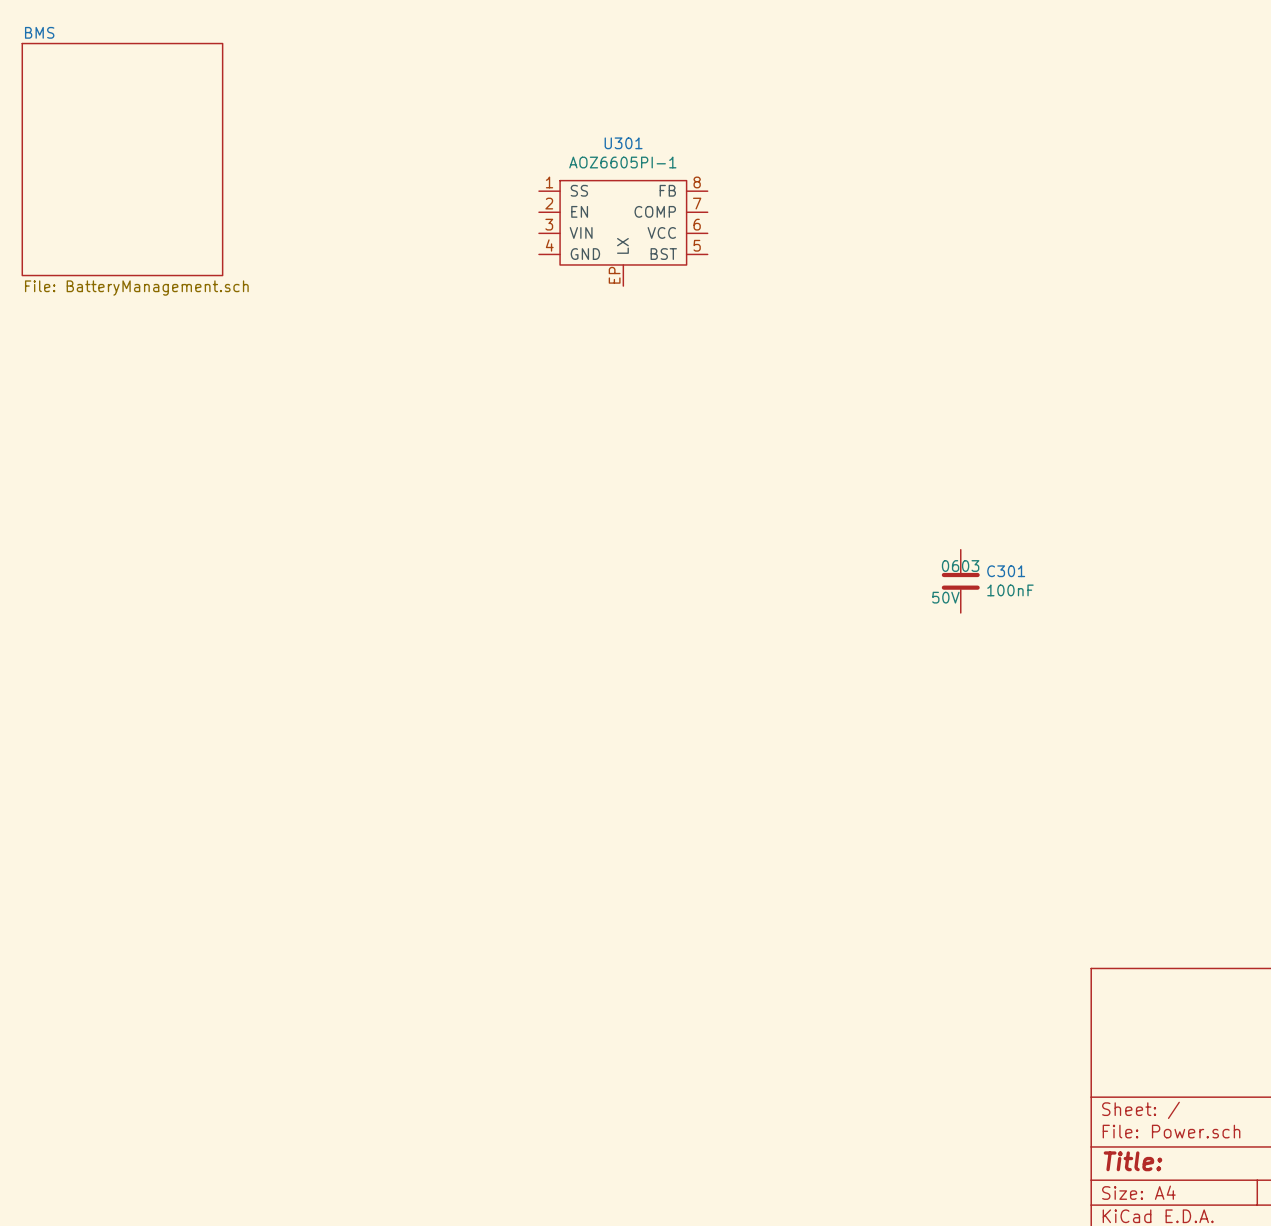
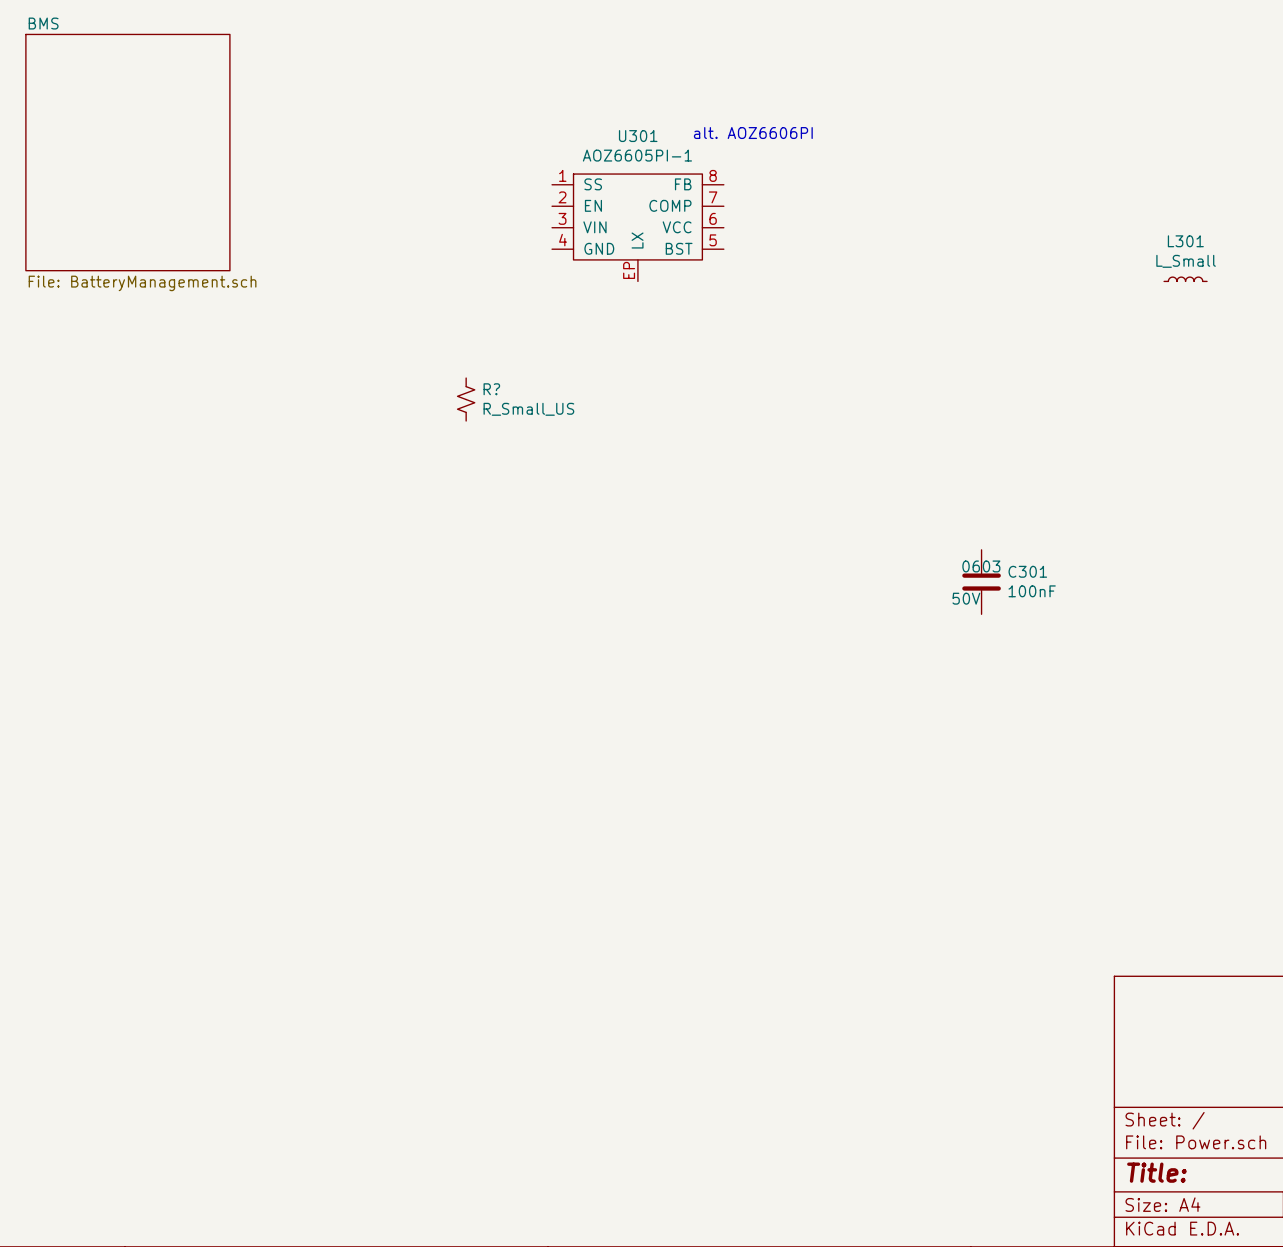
text: none -> alt. AOZ6606PI (753, 133)
L301: none -> L_Small (1185, 279)
R?: none -> R_Small_US (466, 399)

